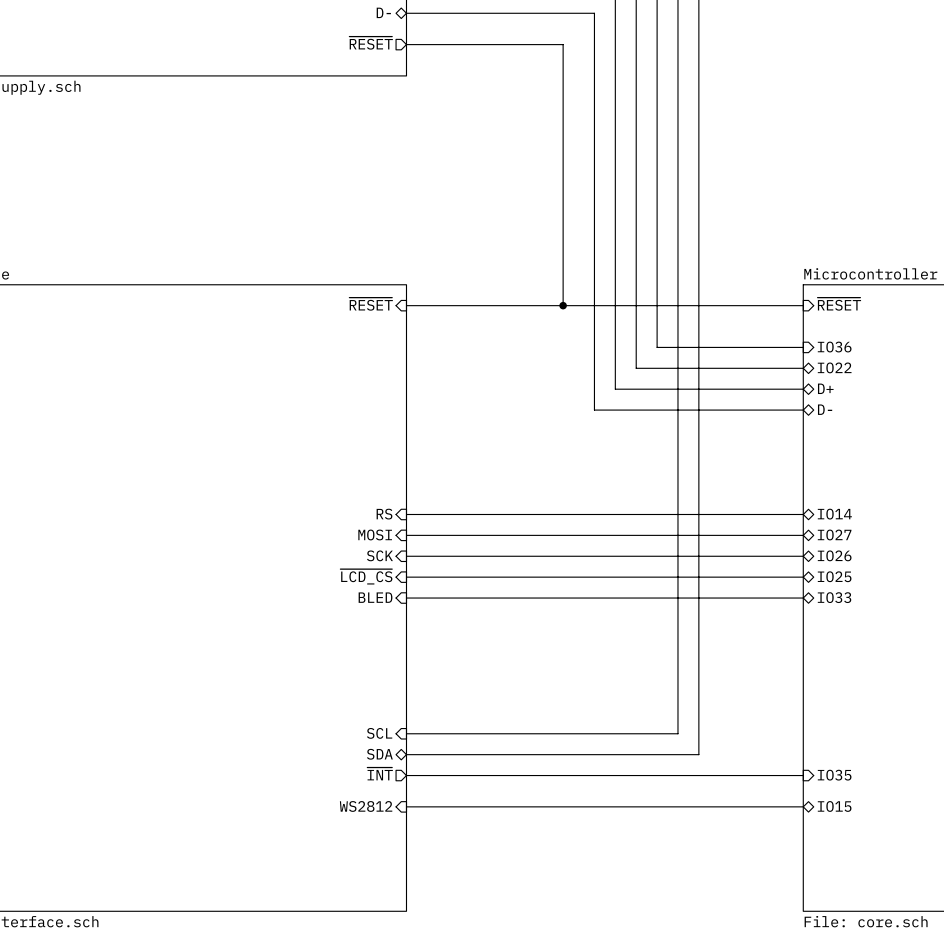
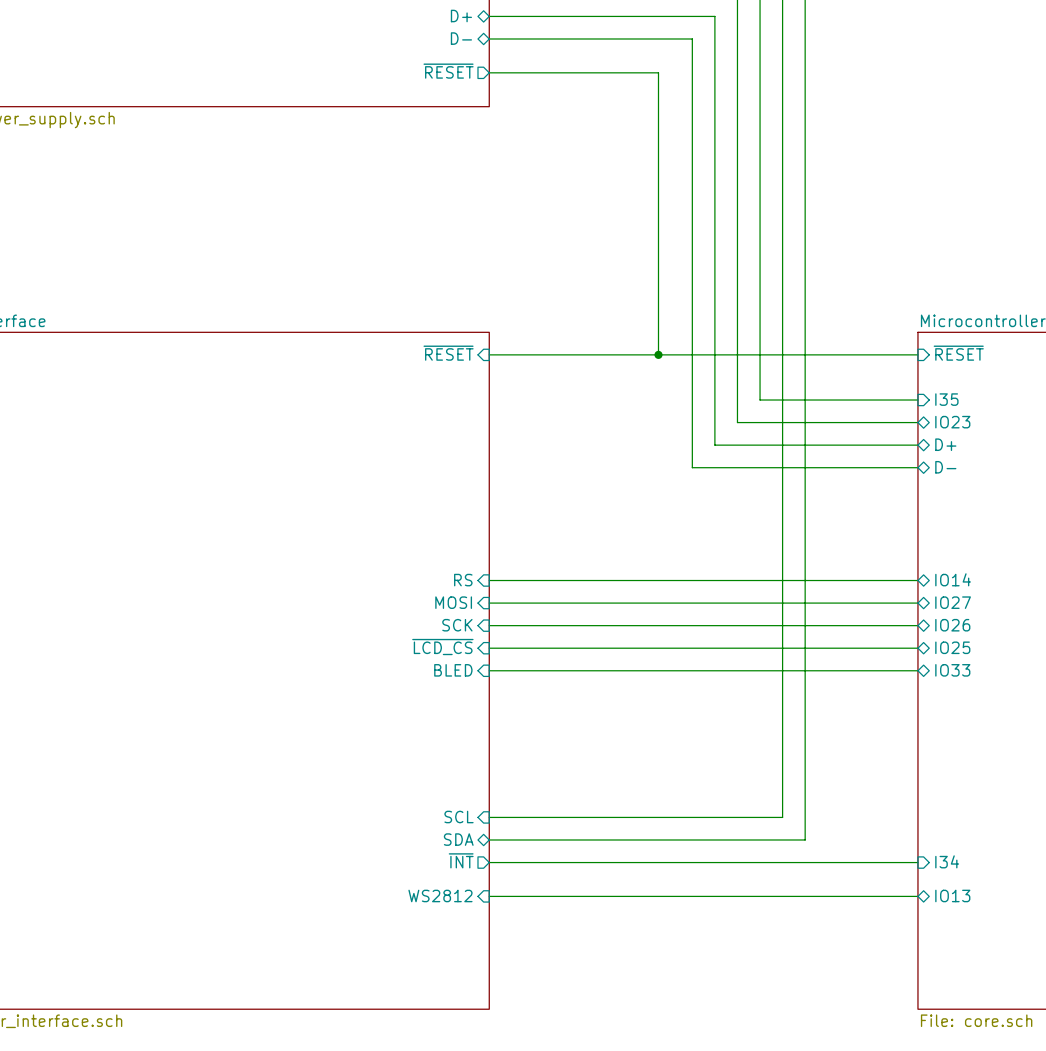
sheet pin: IO36 (834, 347) -> I35 (946, 399)
sheet pin: IO22 (834, 367) -> IO23 (952, 422)
sheet pin: IO35 (834, 775) -> I34 (947, 861)
sheet pin: IO15 (834, 806) -> IO13 (952, 895)

